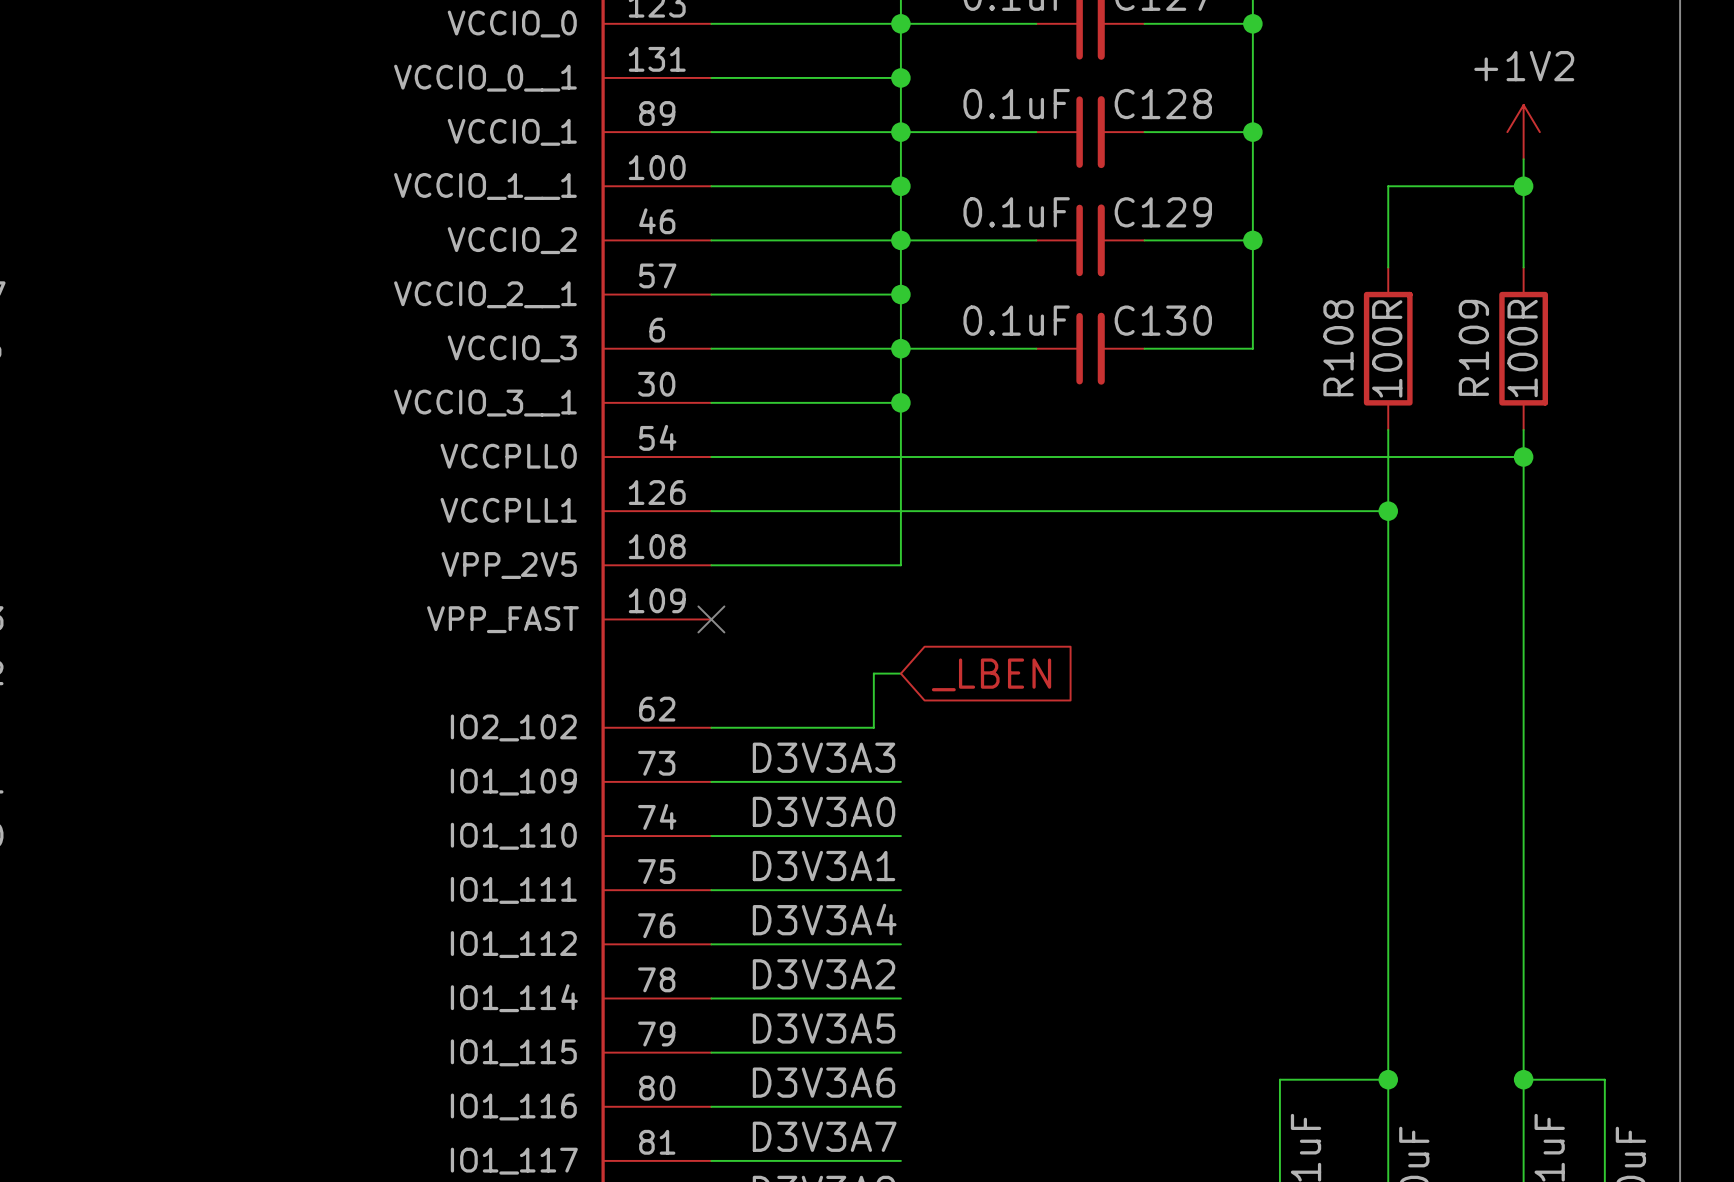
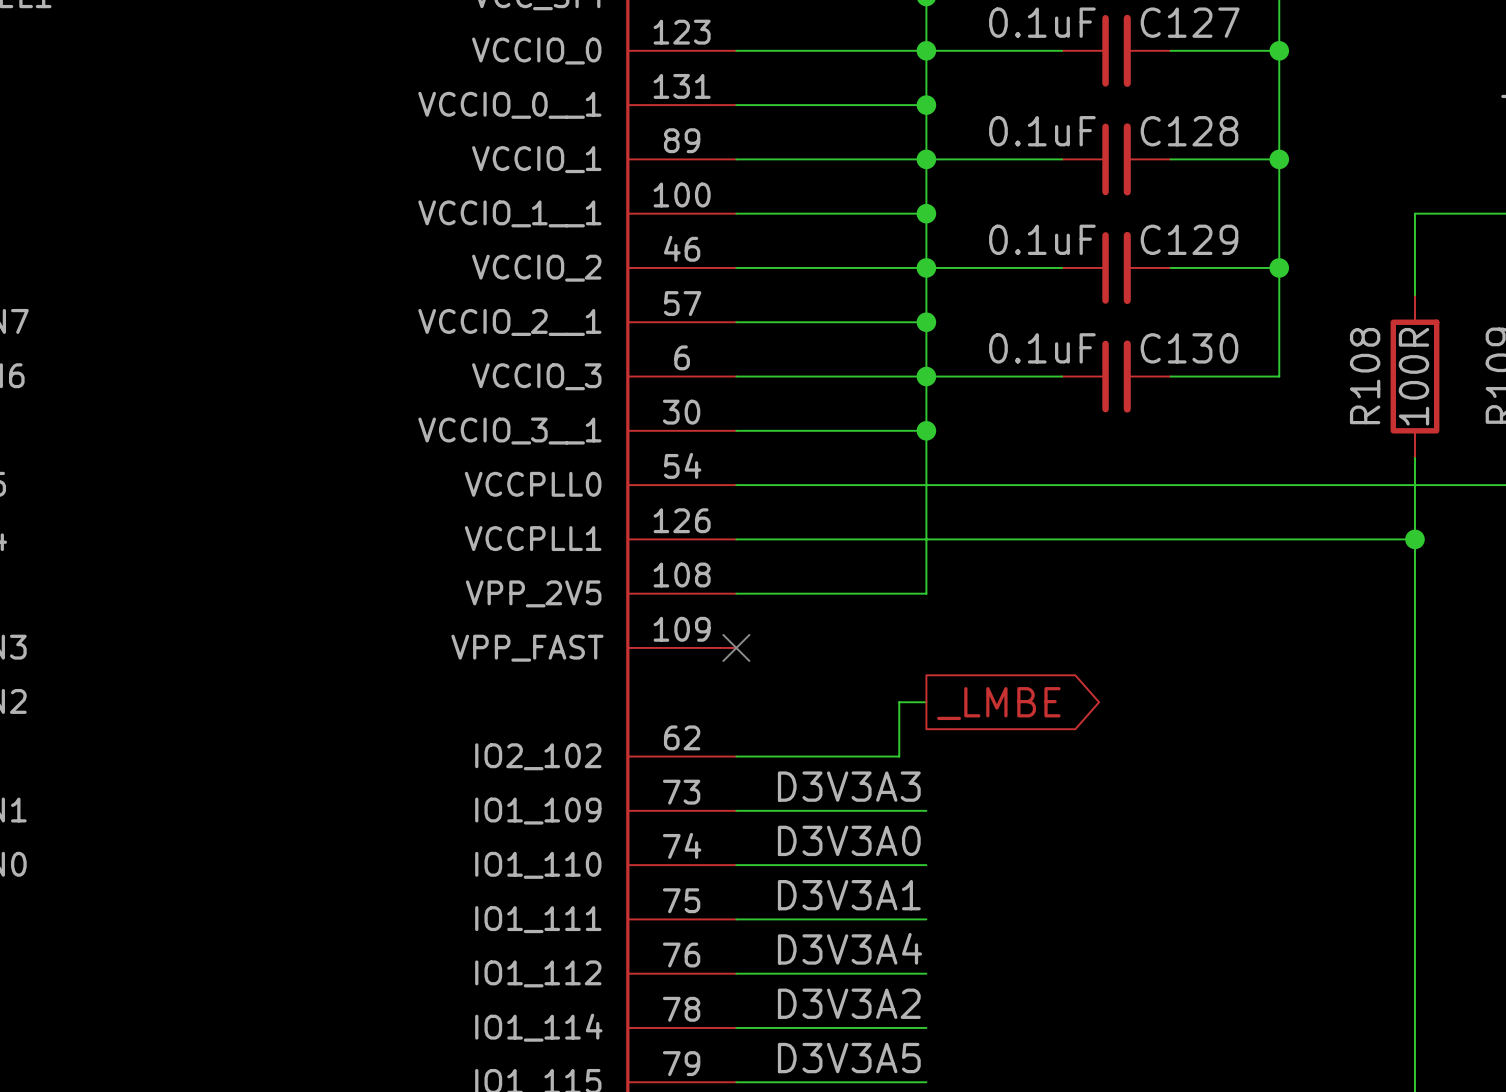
global label shape: input (991, 674) -> output (998, 703)
global label: _LBEN (991, 674) -> _LMBE (998, 703)

